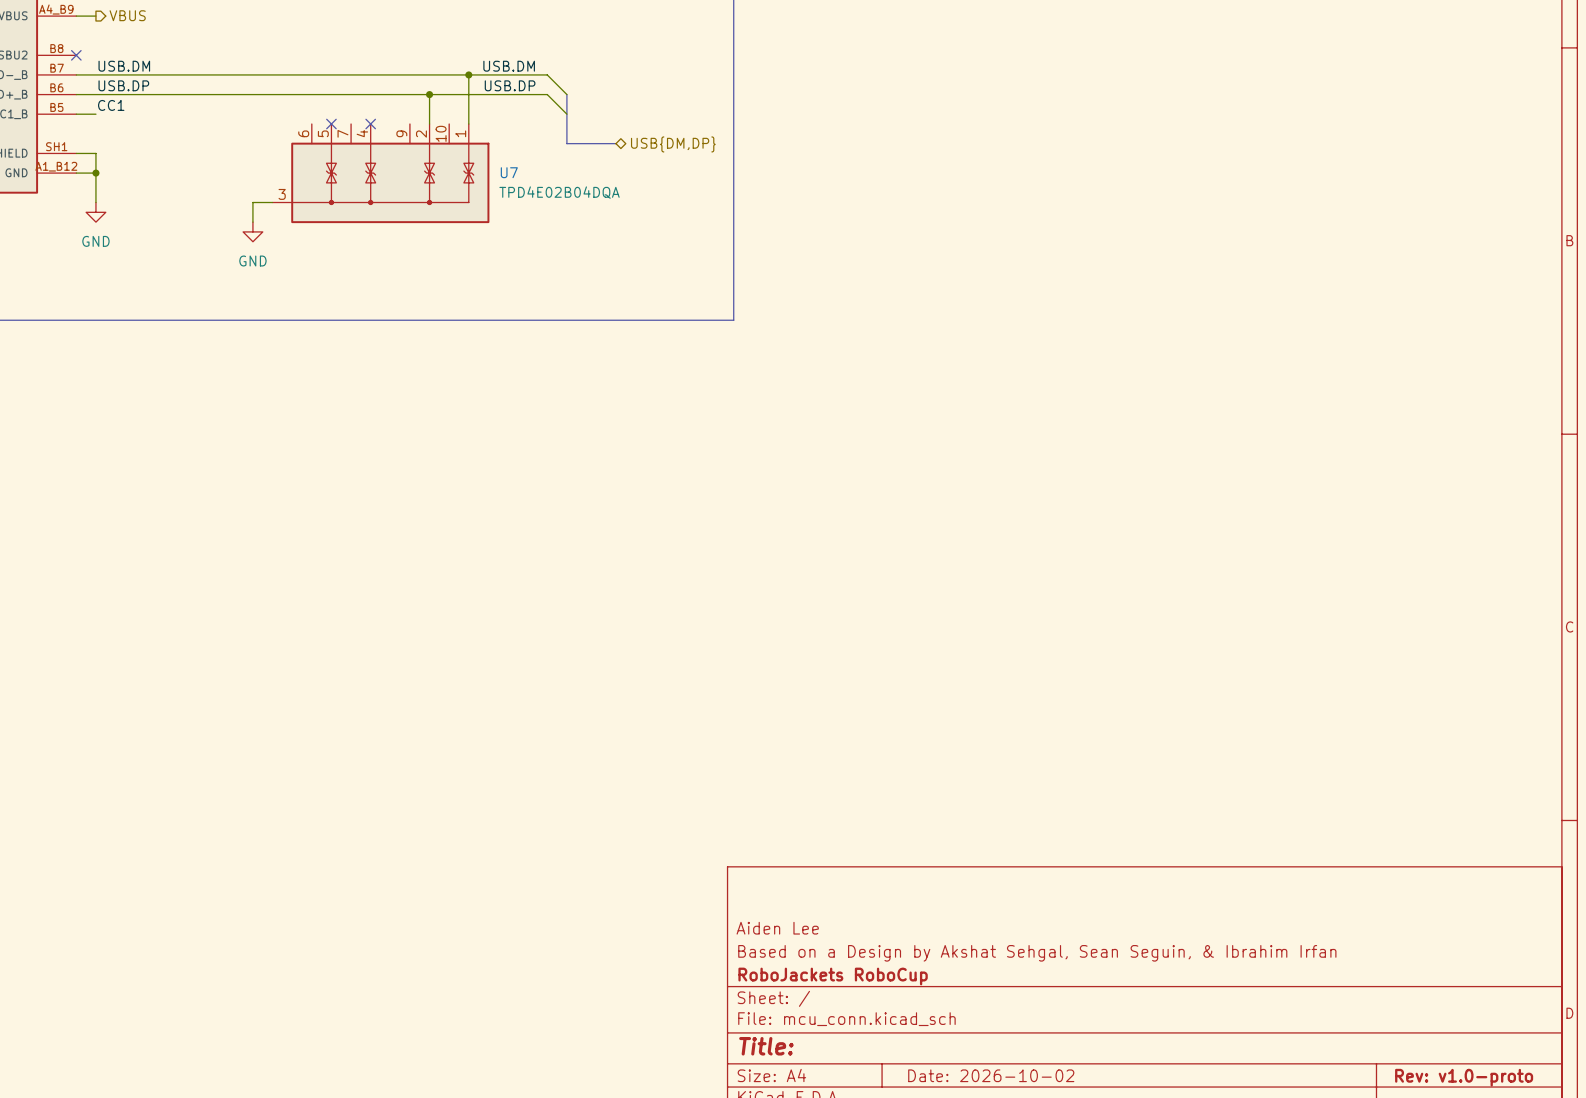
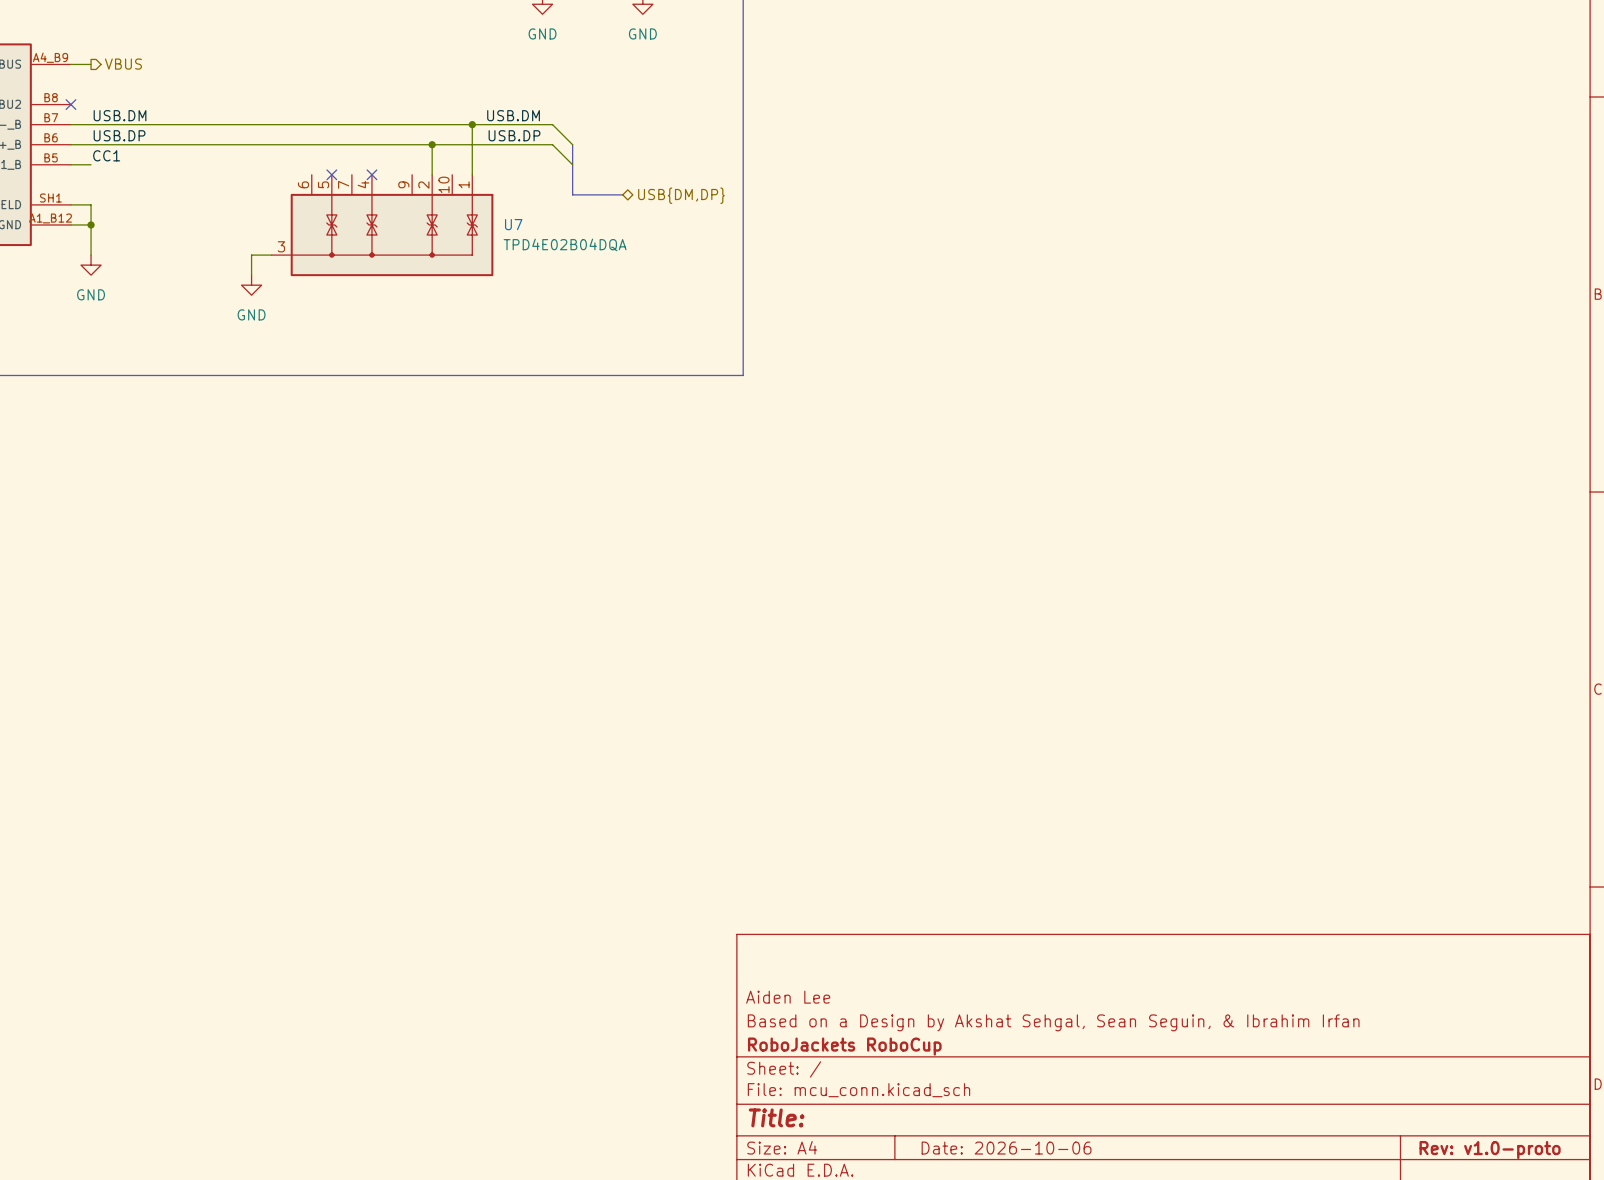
title block: Date: 2026-10-02 (991, 1075) -> Date: 2026-10-06 (1006, 1148)

